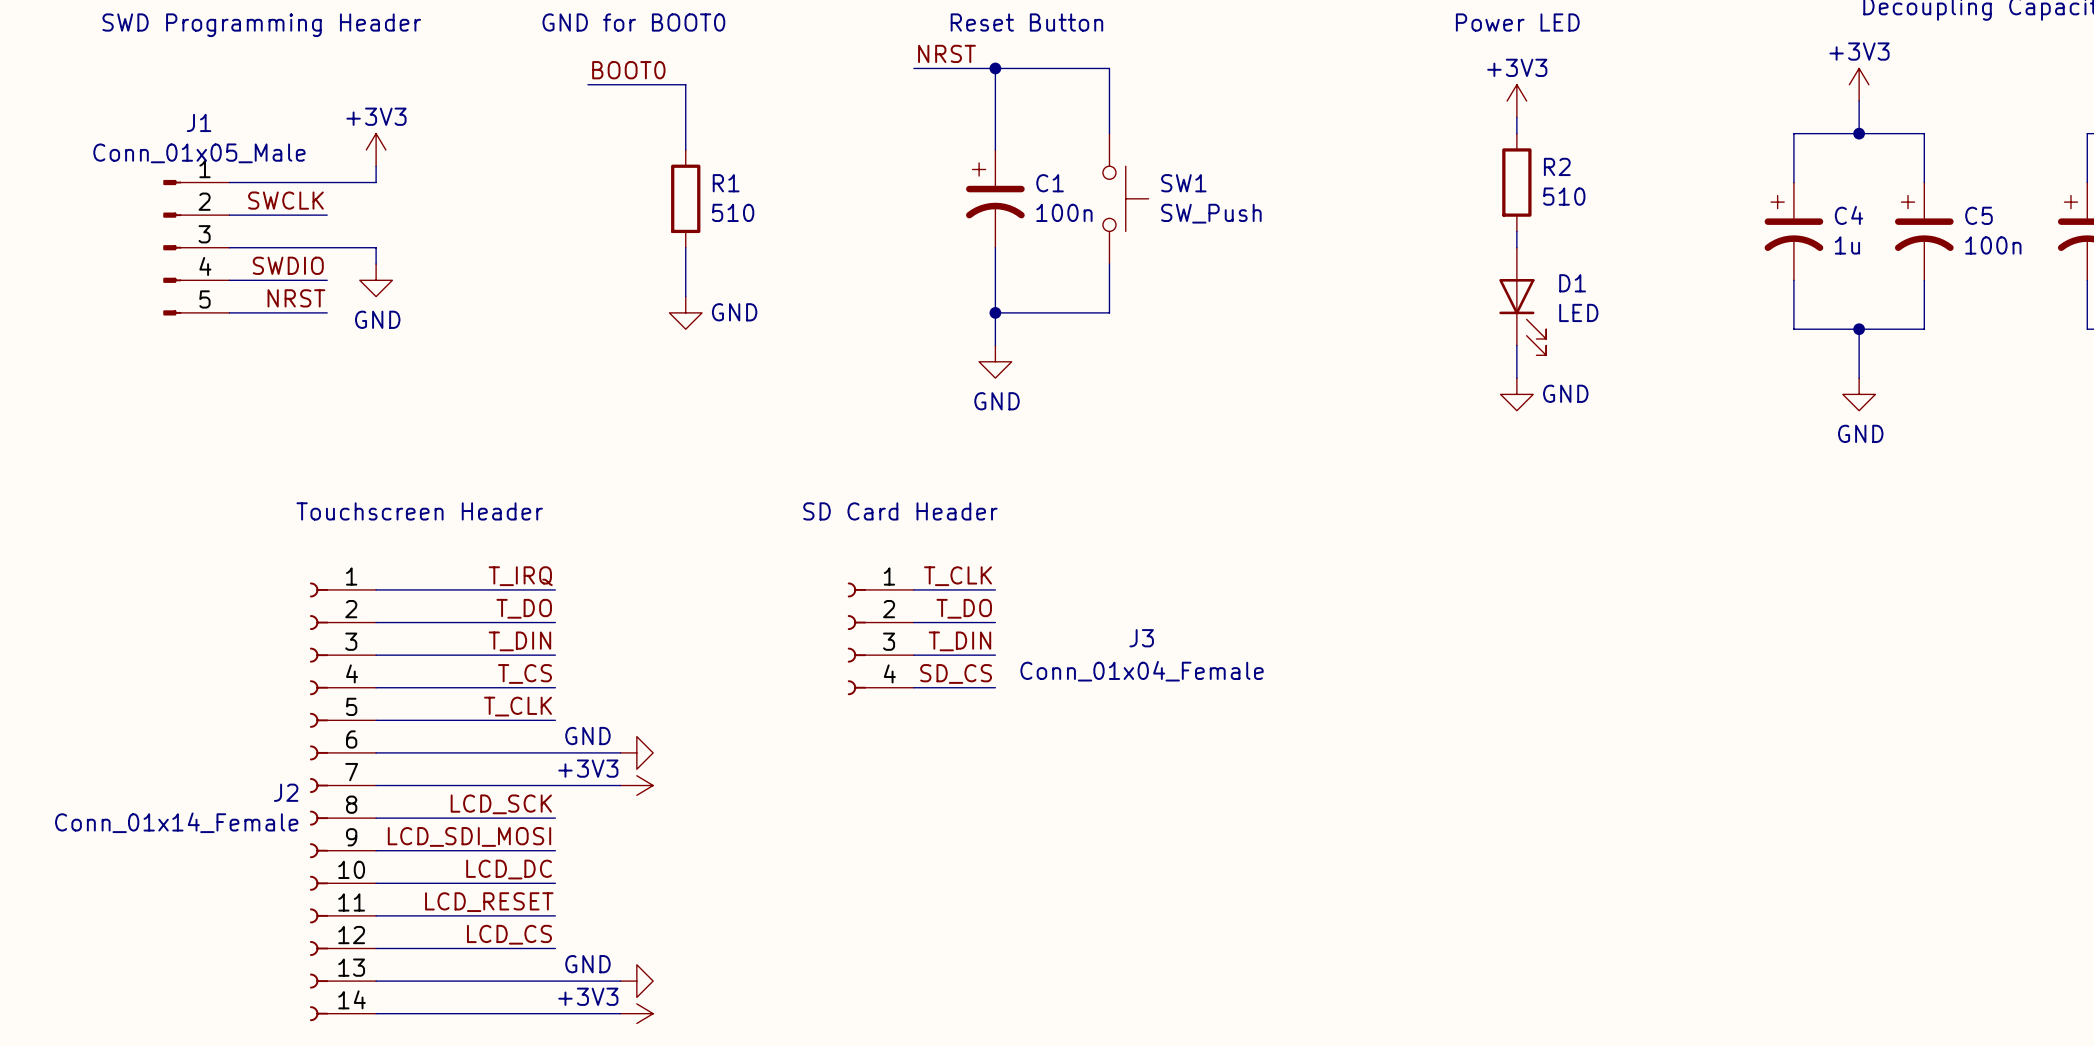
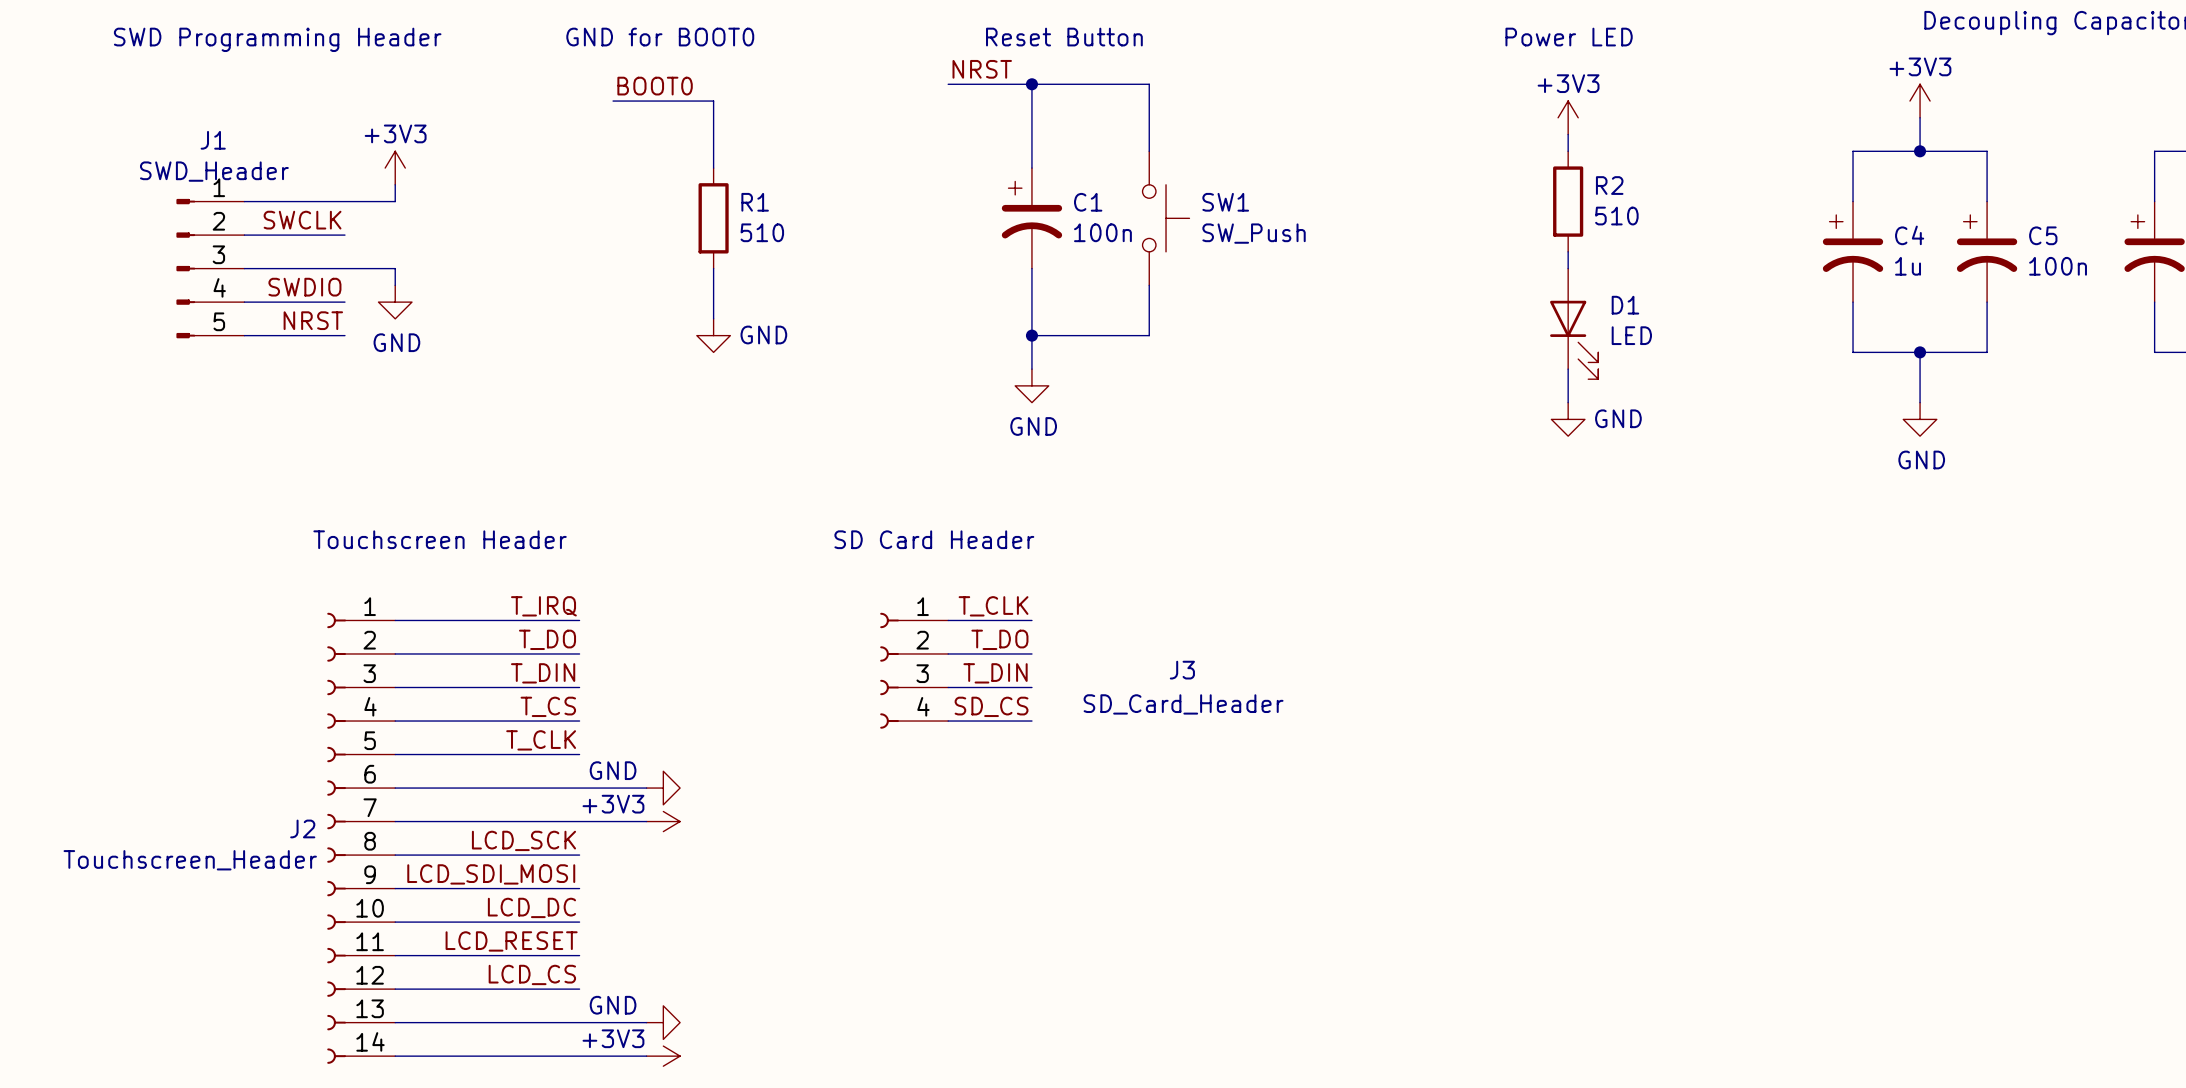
J1 value: Conn_01x05_Male (199, 153) -> SWD_Header (214, 171)
J3 value: Conn_01x04_Female (1142, 671) -> SD_Card_Header (1183, 704)
J2 value: Conn_01x14_Female (176, 822) -> Touchscreen_Header (190, 860)

